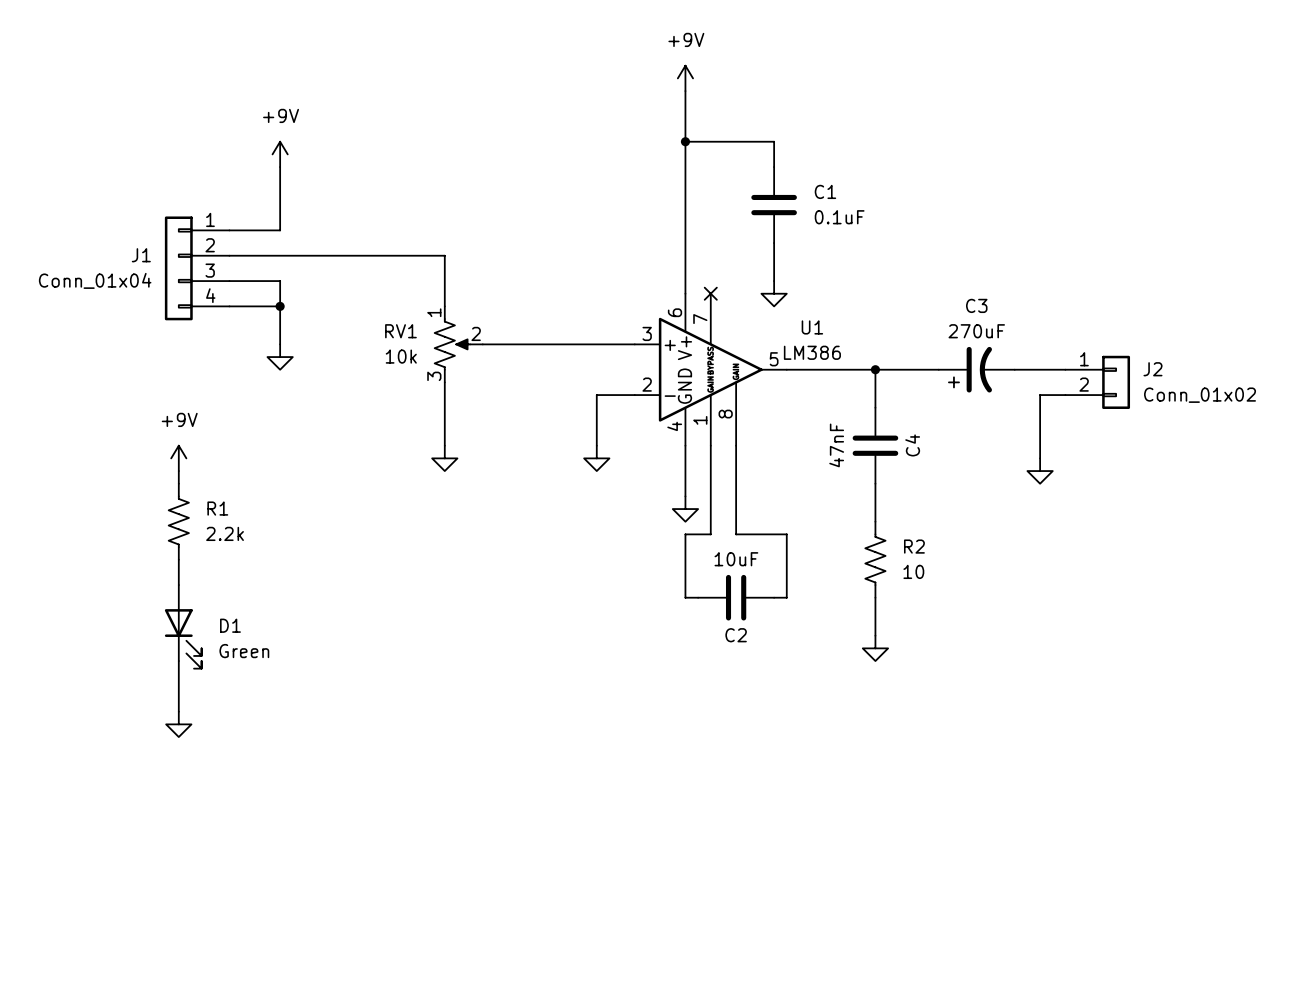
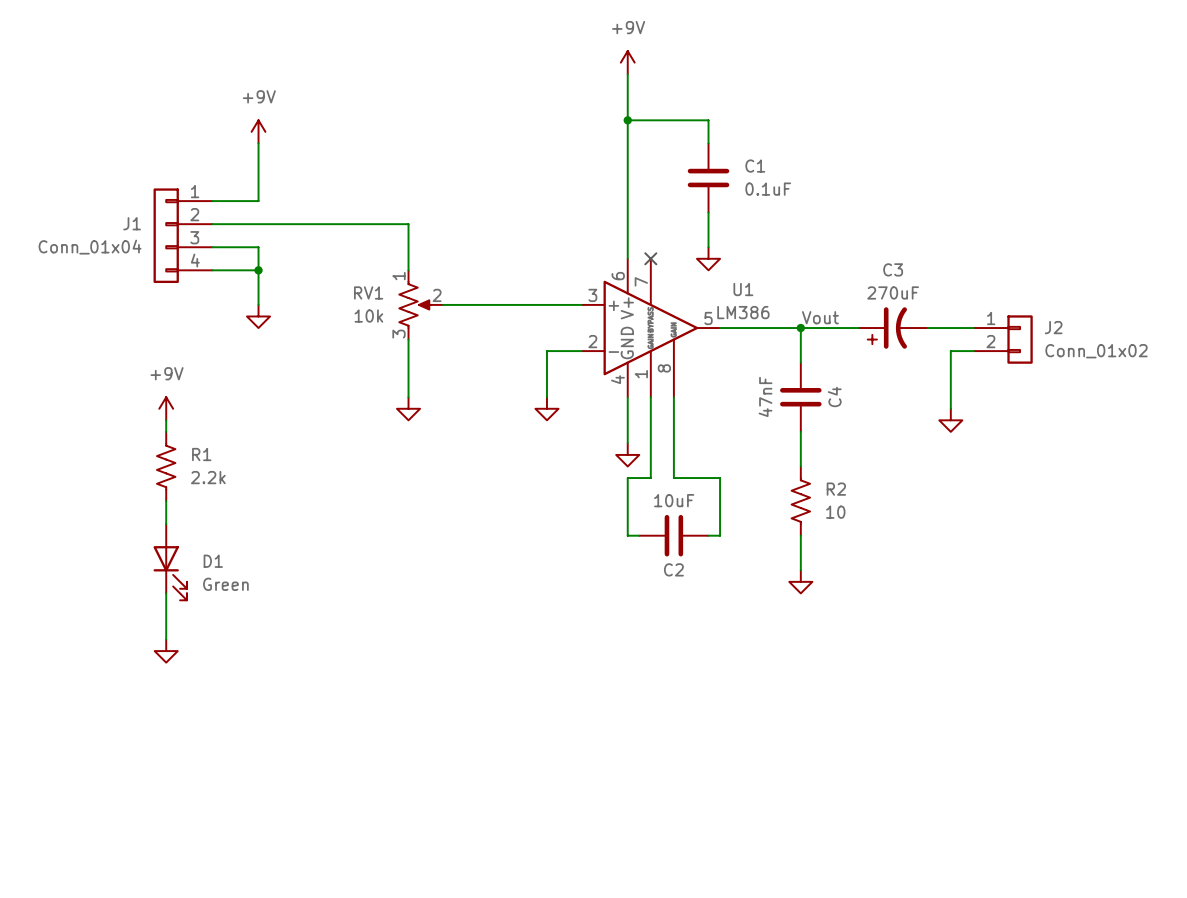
label: none -> Vout (820, 317)

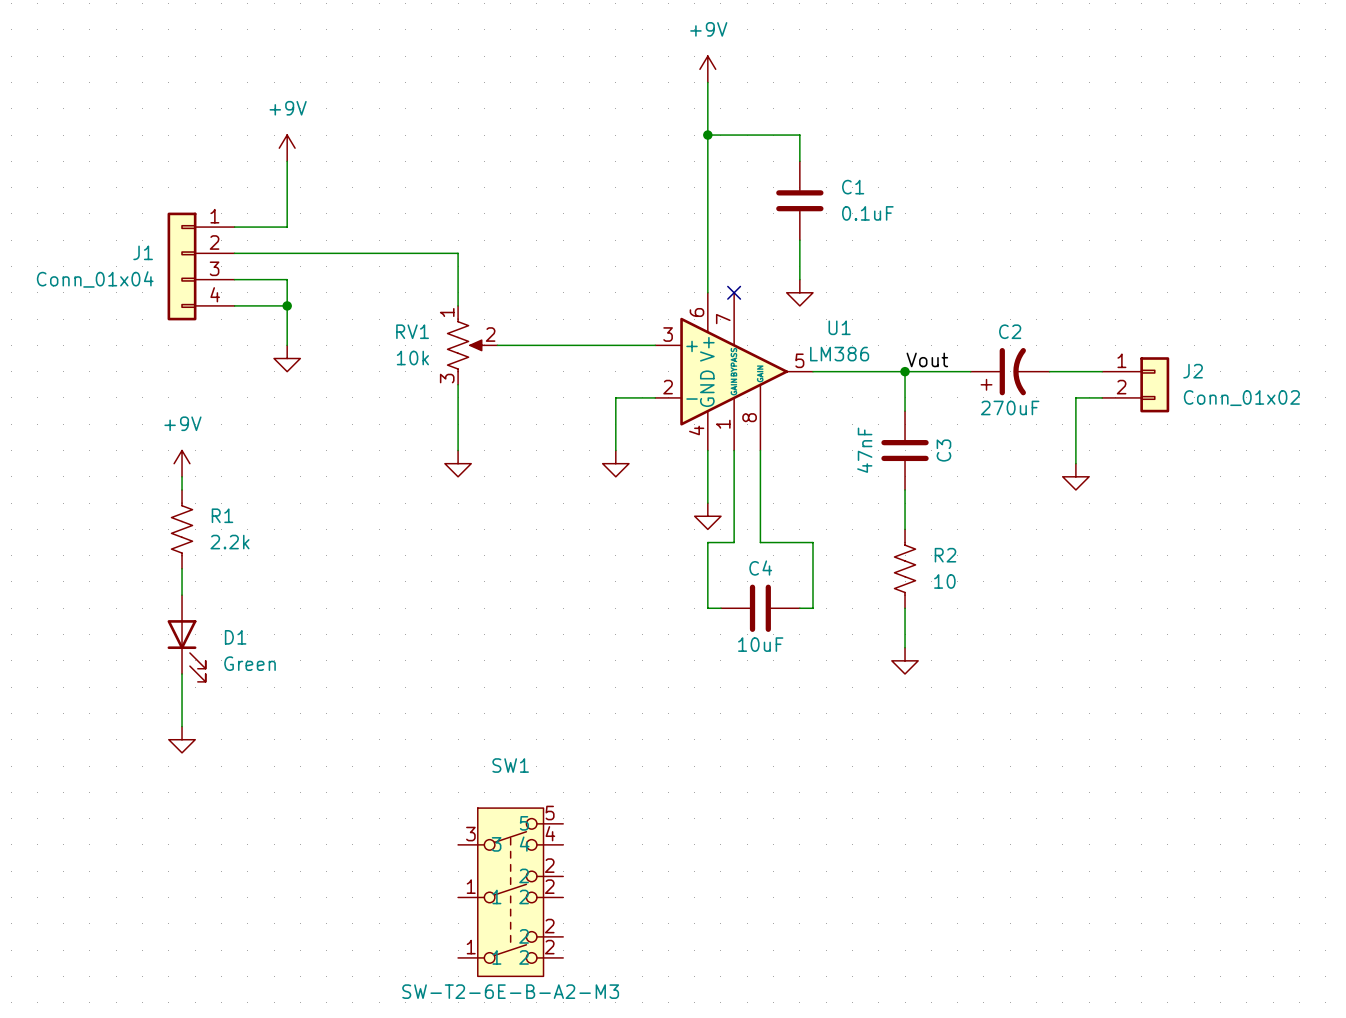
C3 name: C3 (893, 269) -> C2 (1010, 331)
C3 value position: 270uF (893, 292) -> 270uF (1010, 407)
C4 name: C4 (834, 396) -> C3 (943, 450)
C2 value position: 10uF (674, 500) -> 10uF (760, 644)
C2 name: C2 (673, 569) -> C4 (760, 568)
SW1: none -> (510, 892)

